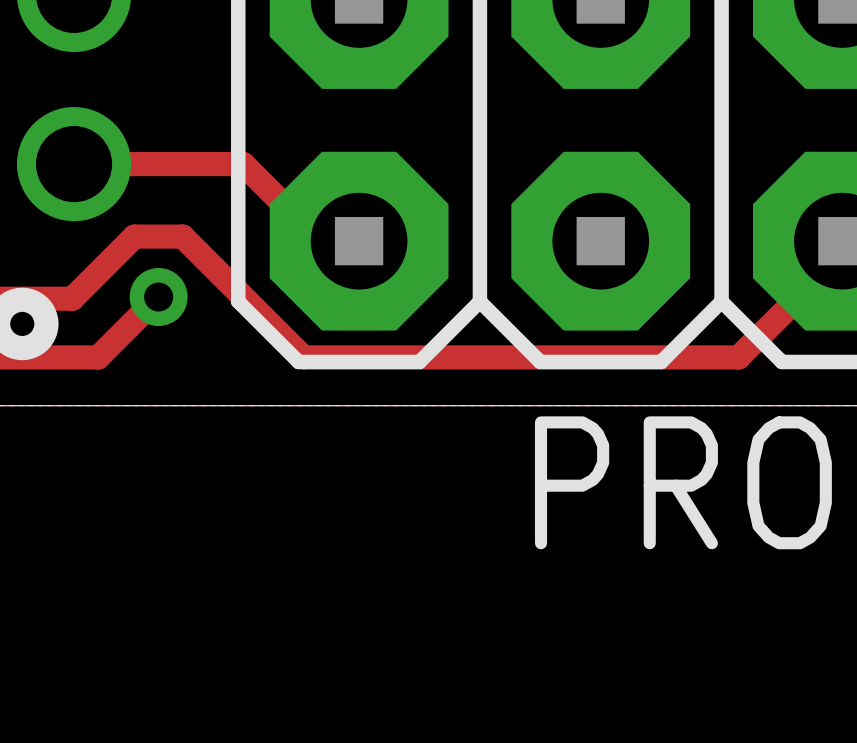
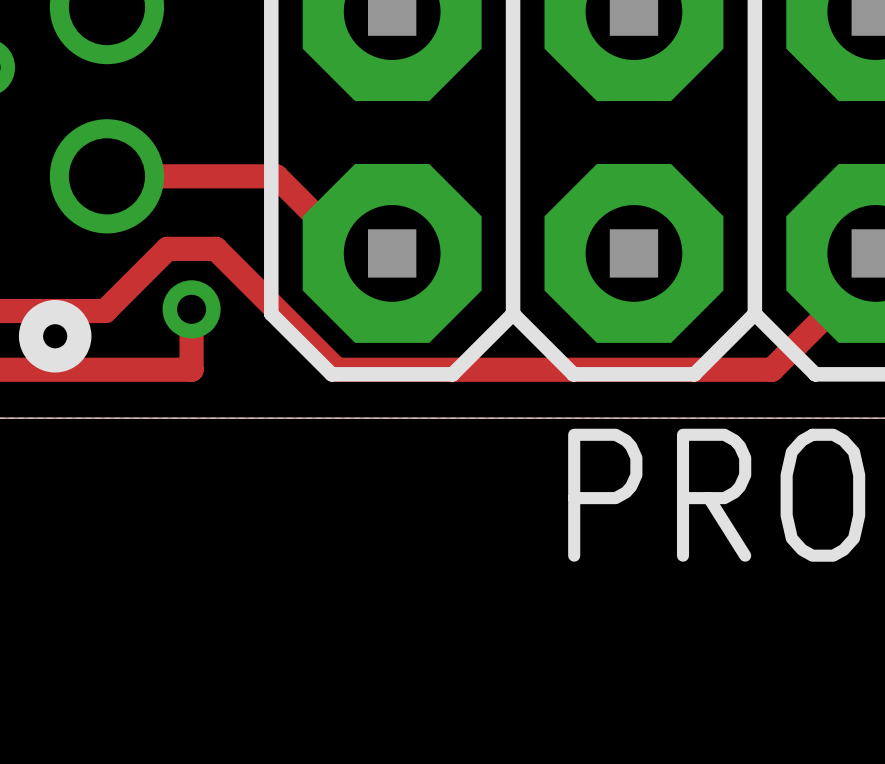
track: (158, 297) (98, 357) -> (191, 309) (191, 369) (131, 369)

